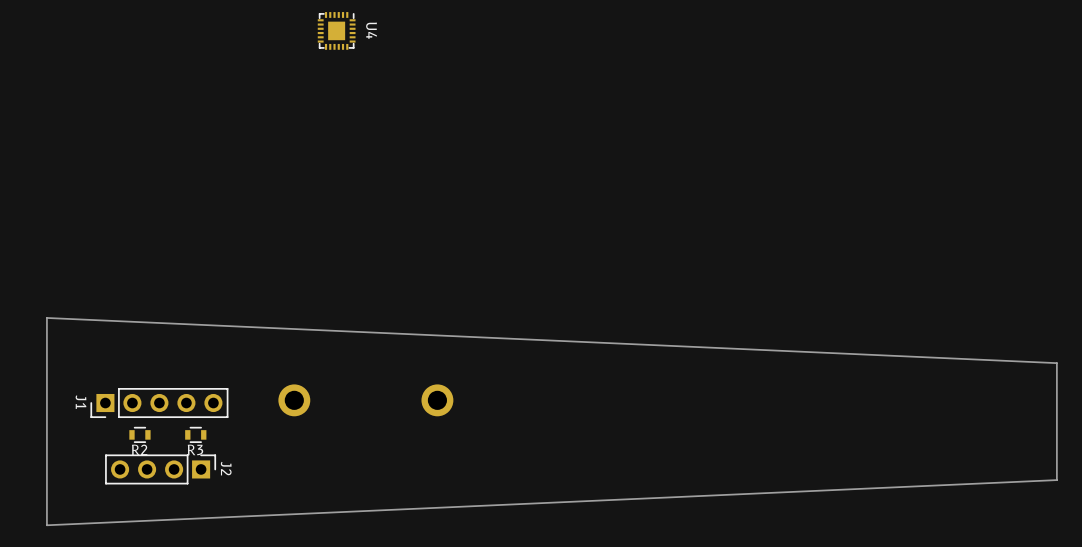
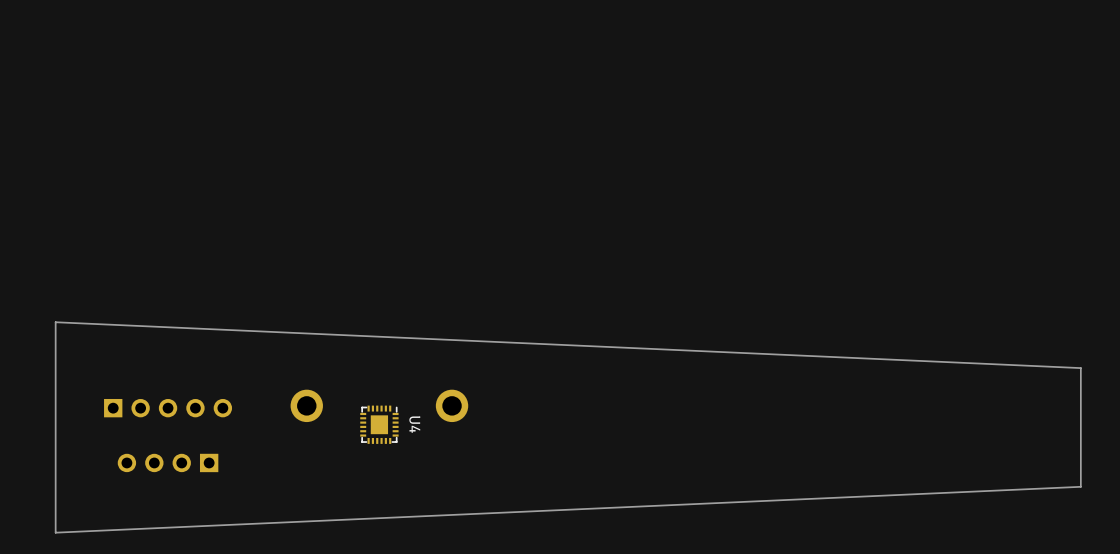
U4 position: (336, 30) -> (379, 424)
J1 side: bottom (159, 403) -> top (168, 408)
R2: (139, 434) -> none
R3: (195, 434) -> none
J2 side: bottom (160, 469) -> top (168, 462)

